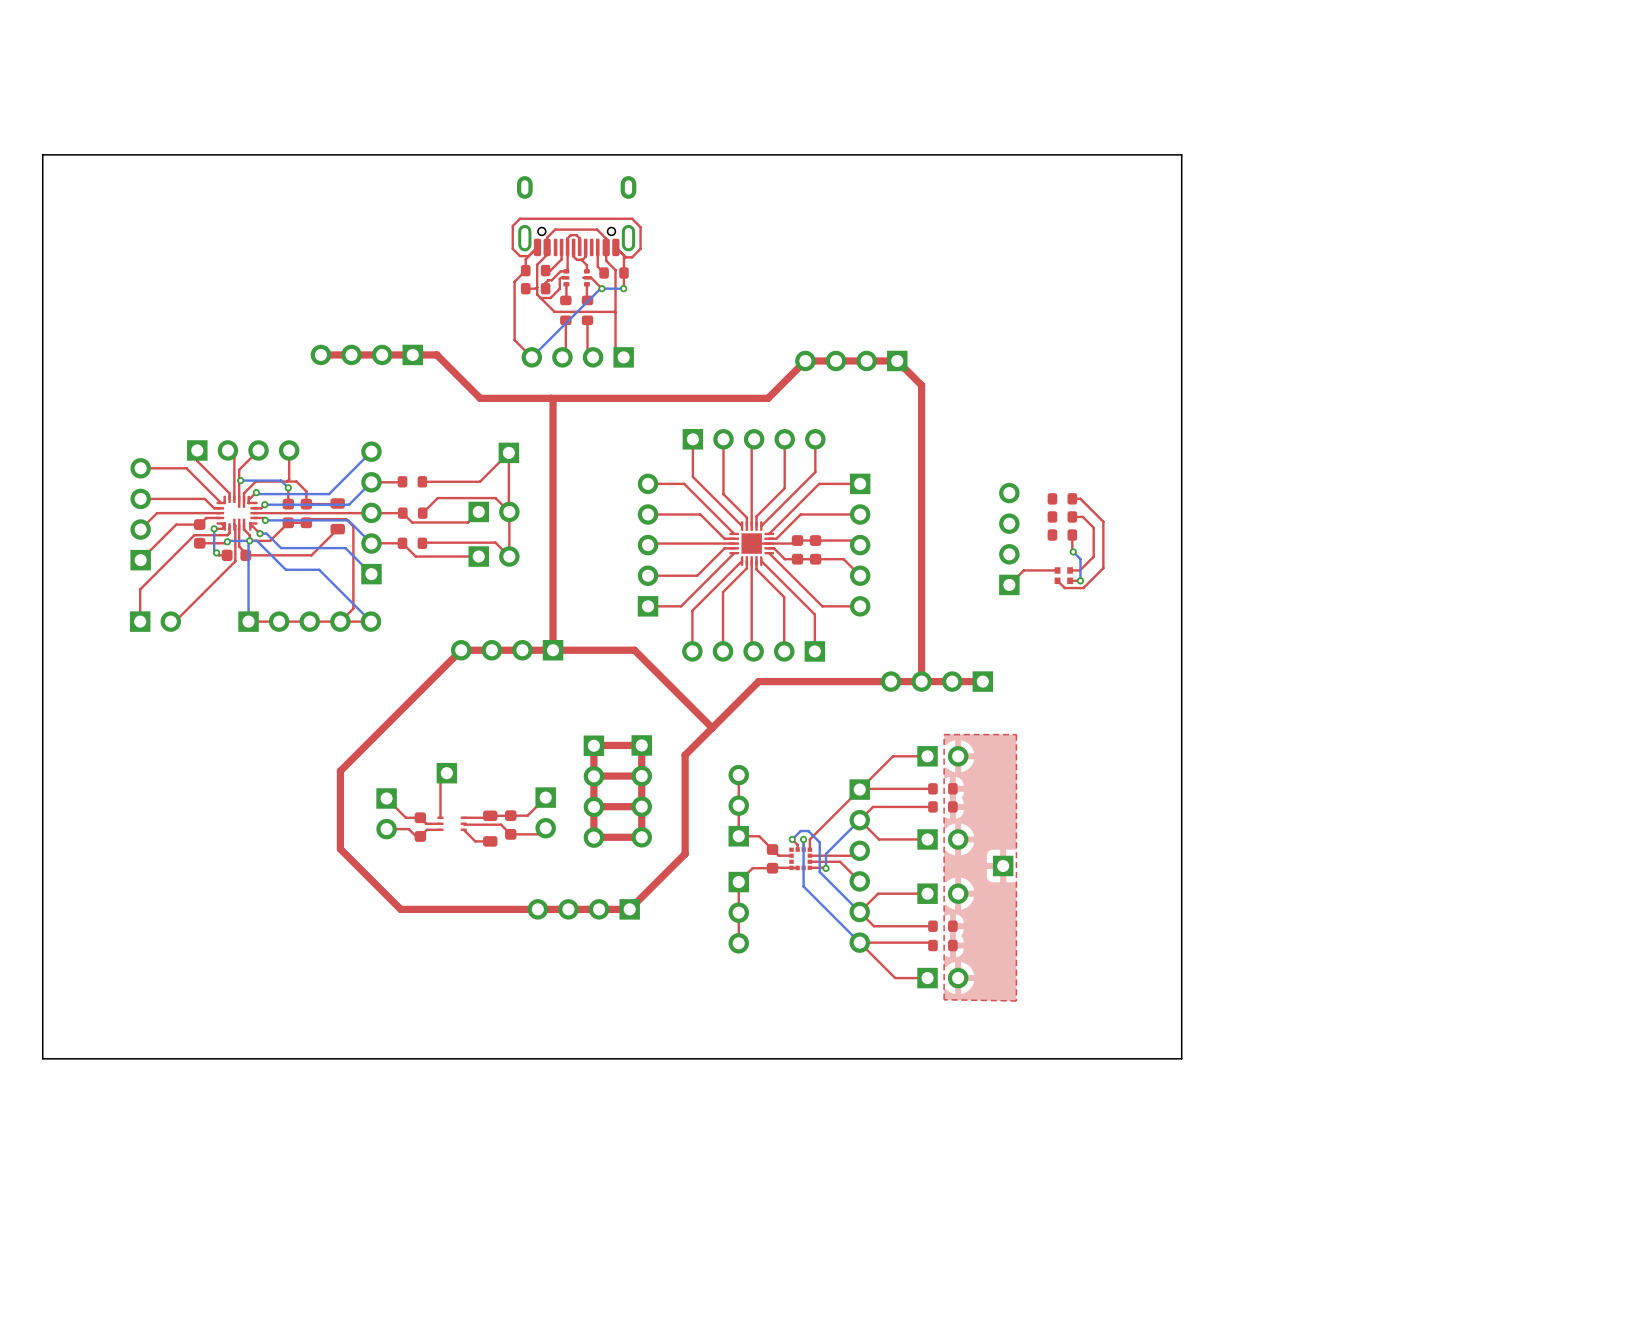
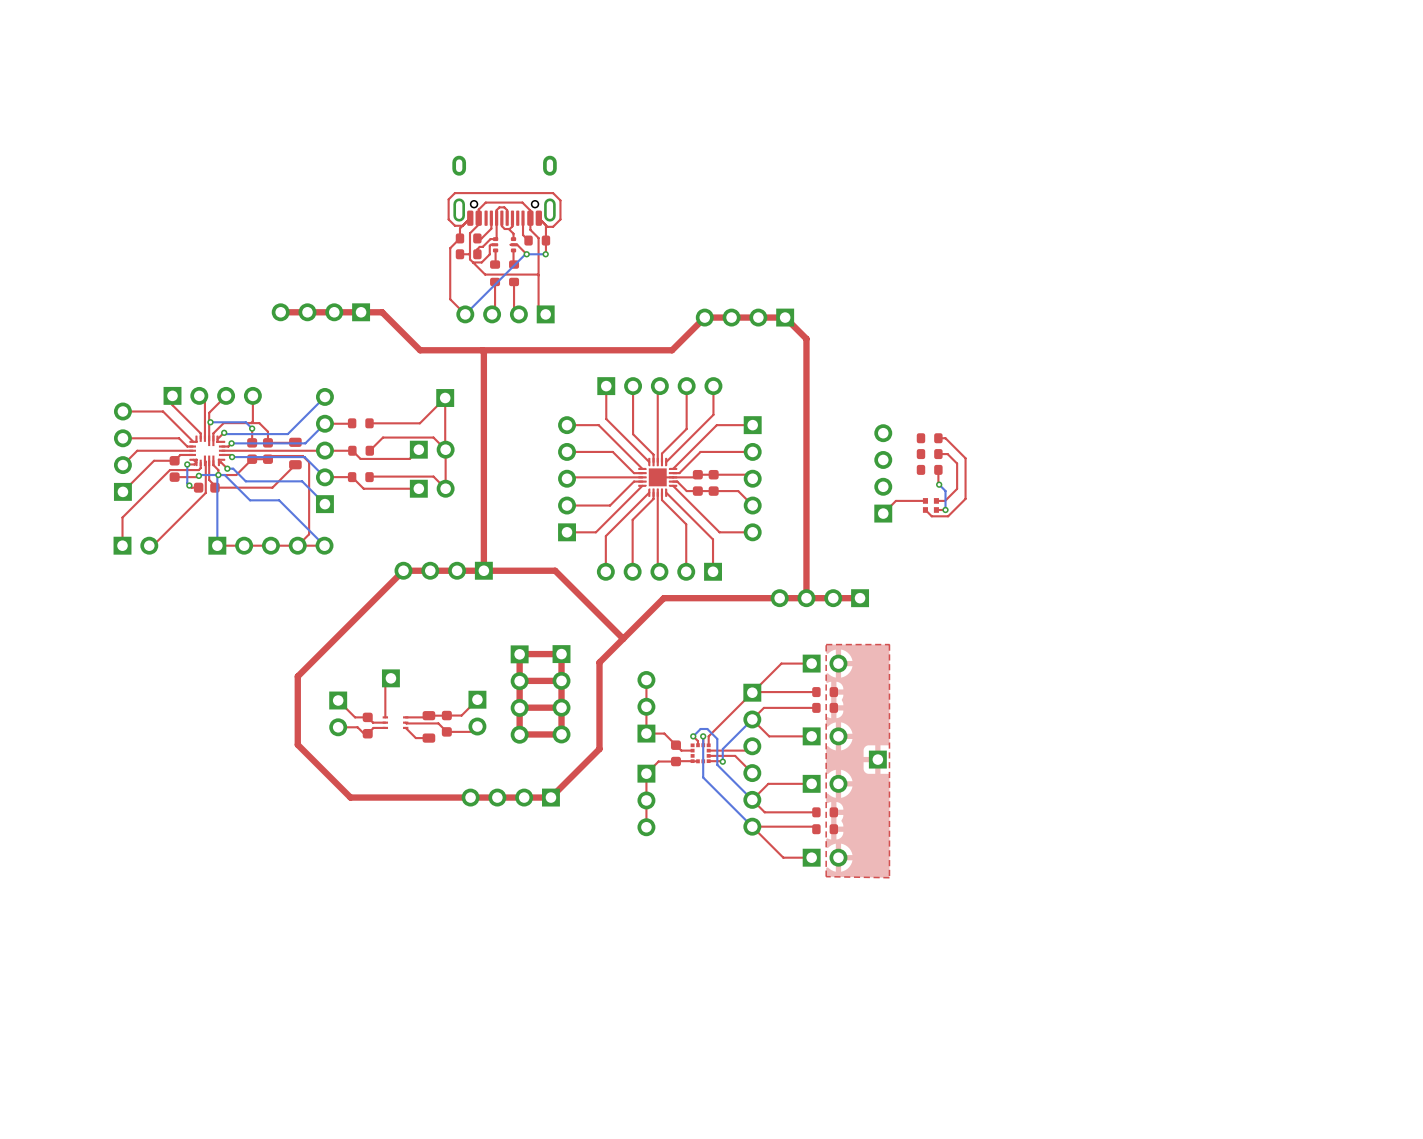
board edge: (1181, 154) (42, 154) (42, 1058) (1181, 1058) (1181, 154) -> none

